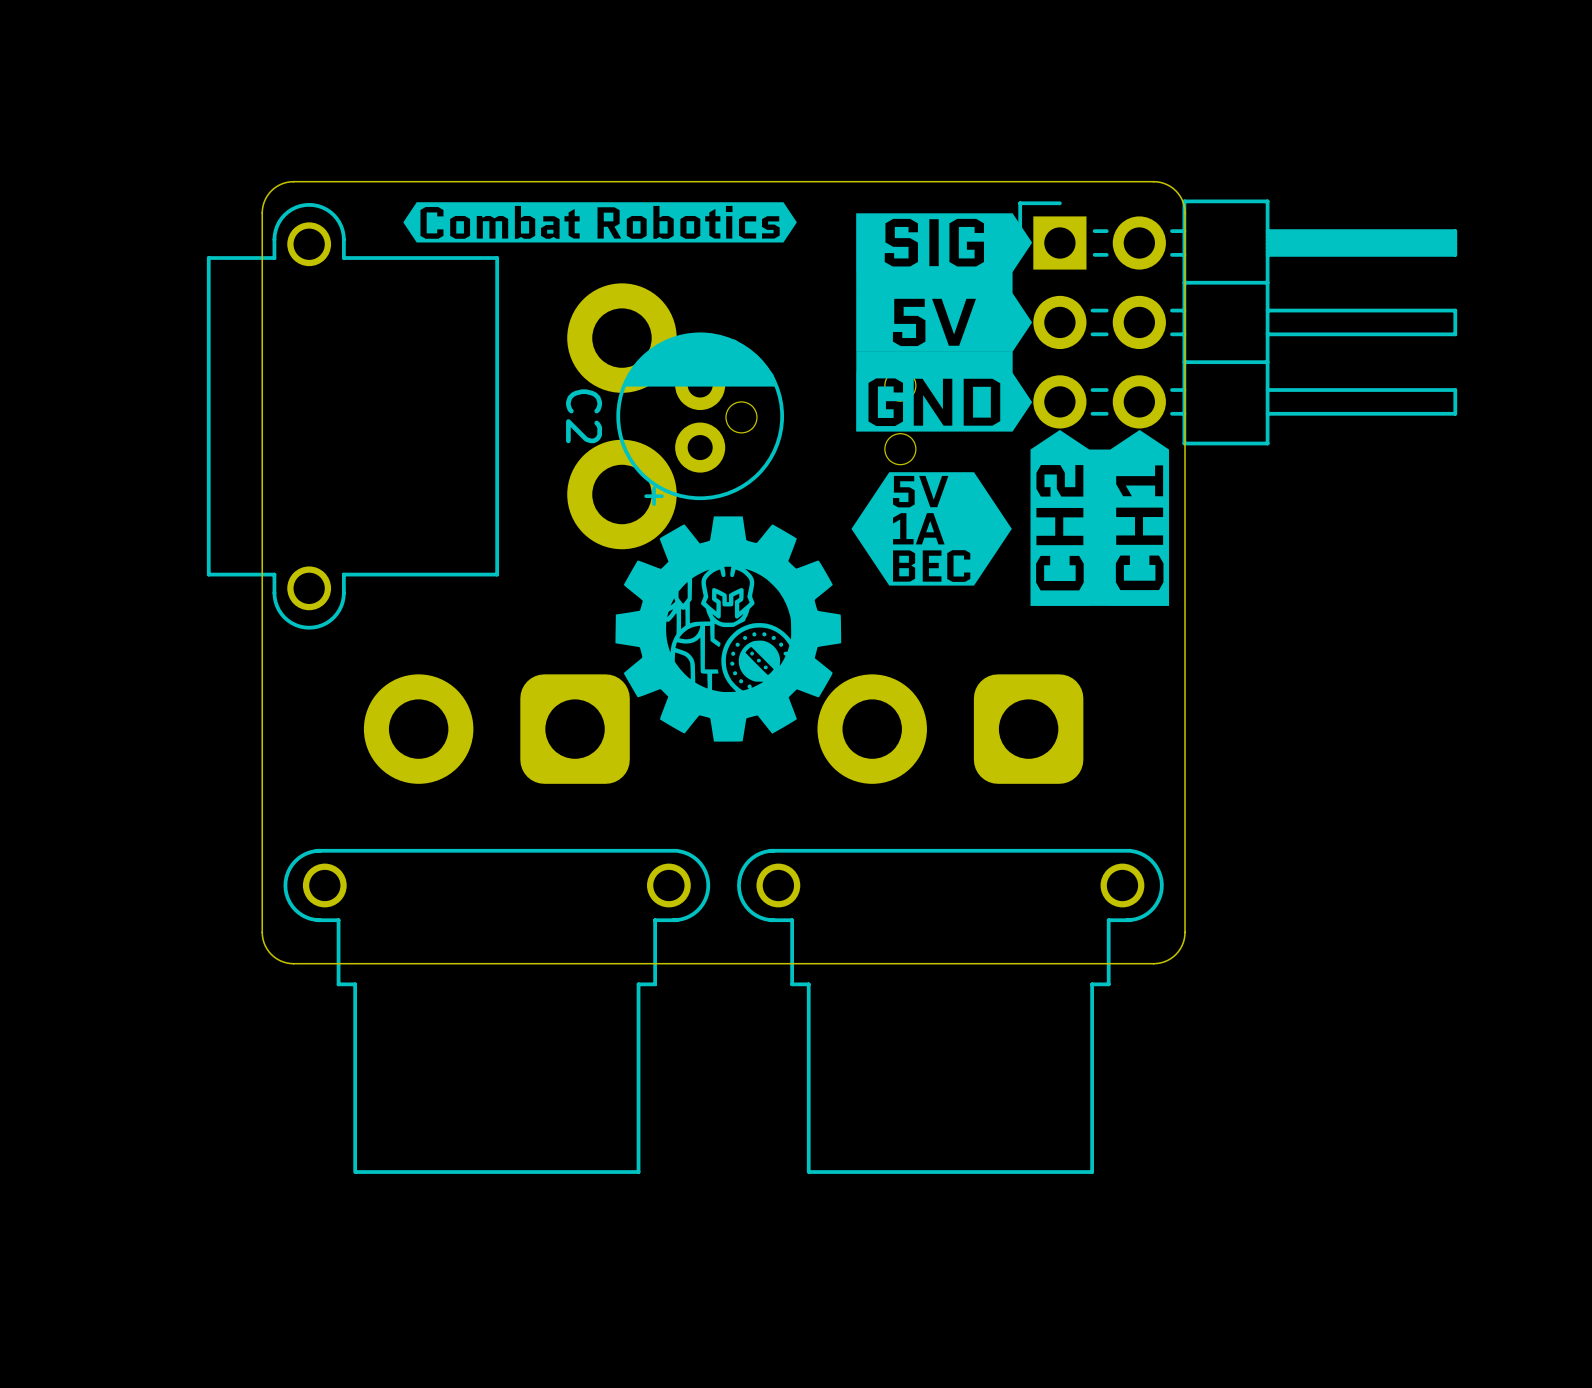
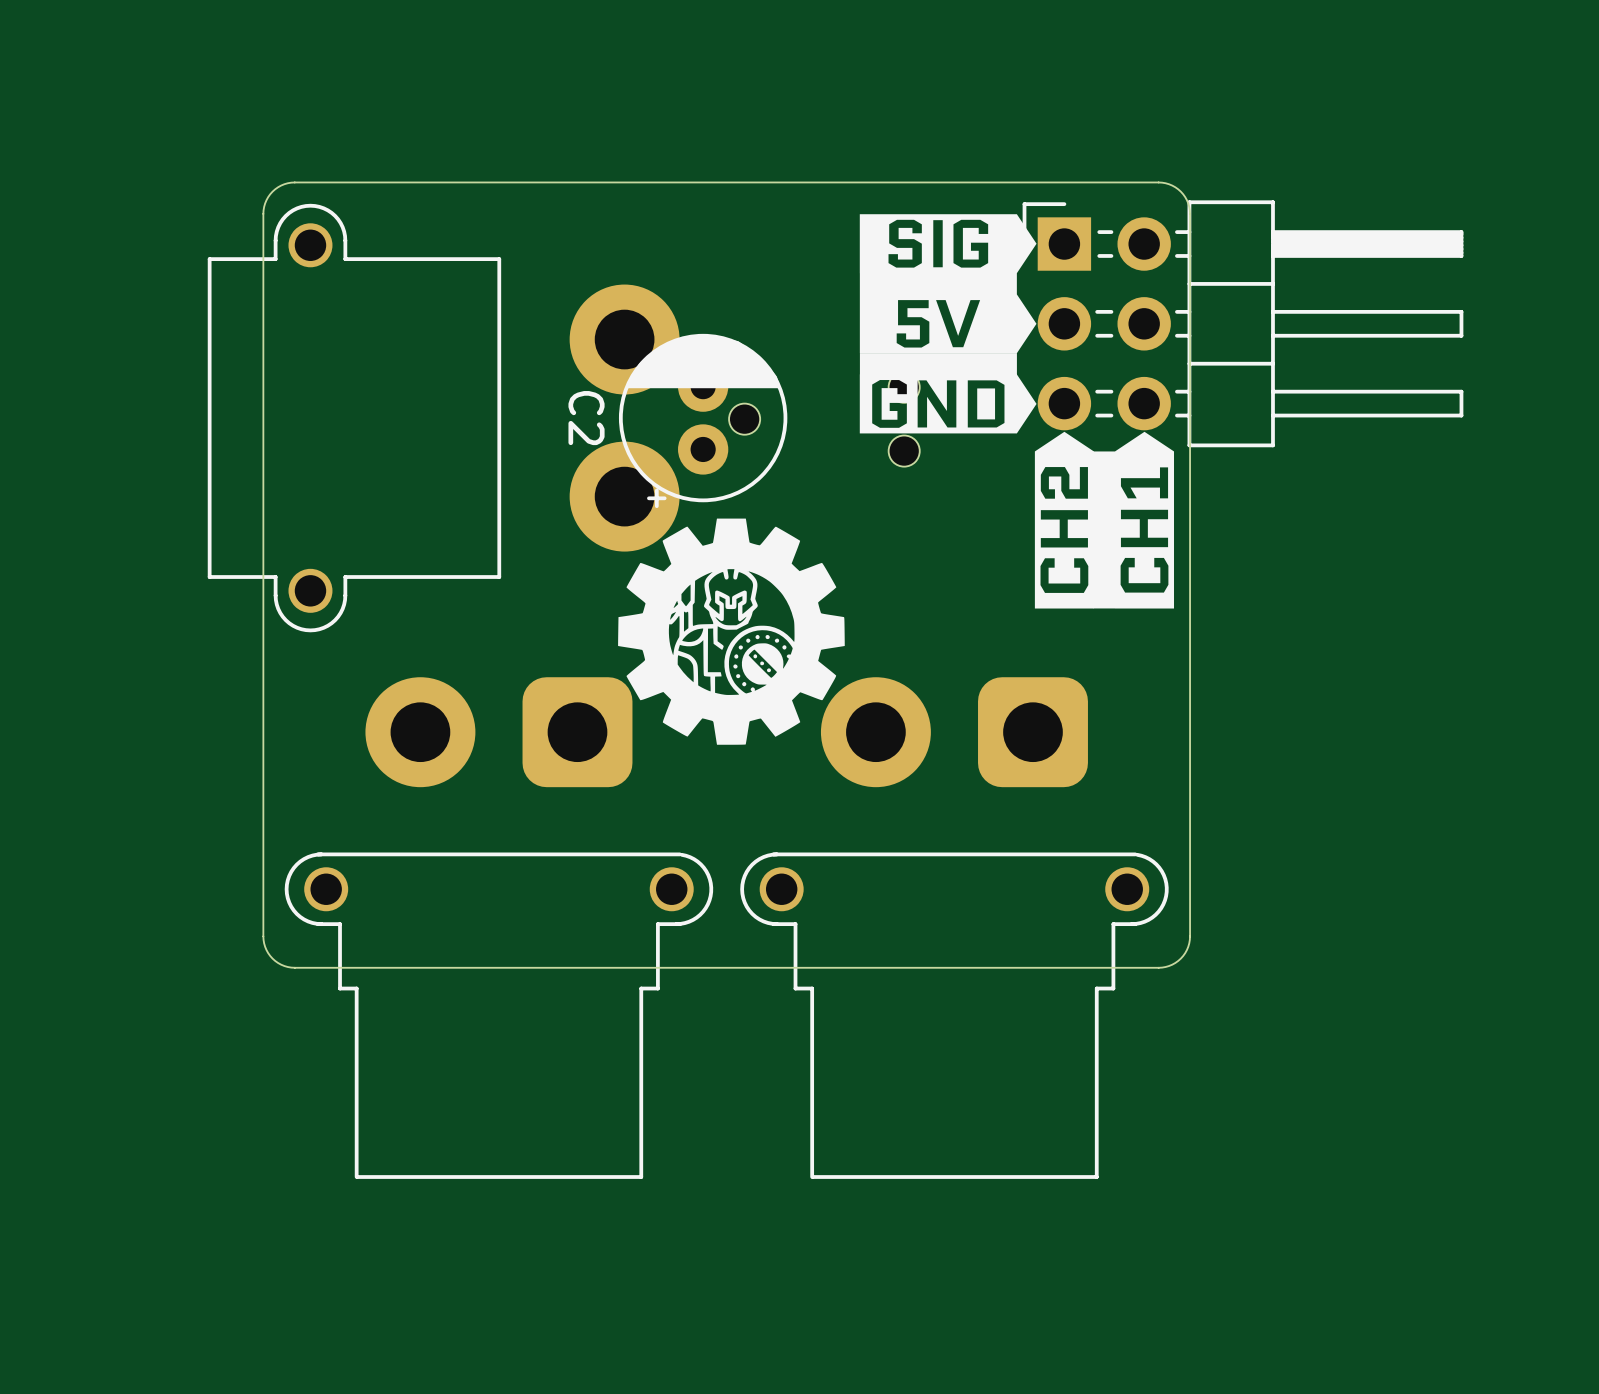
drawing: [403, 202, 797, 243] -> none
drawing: [851, 472, 1012, 586] -> none

